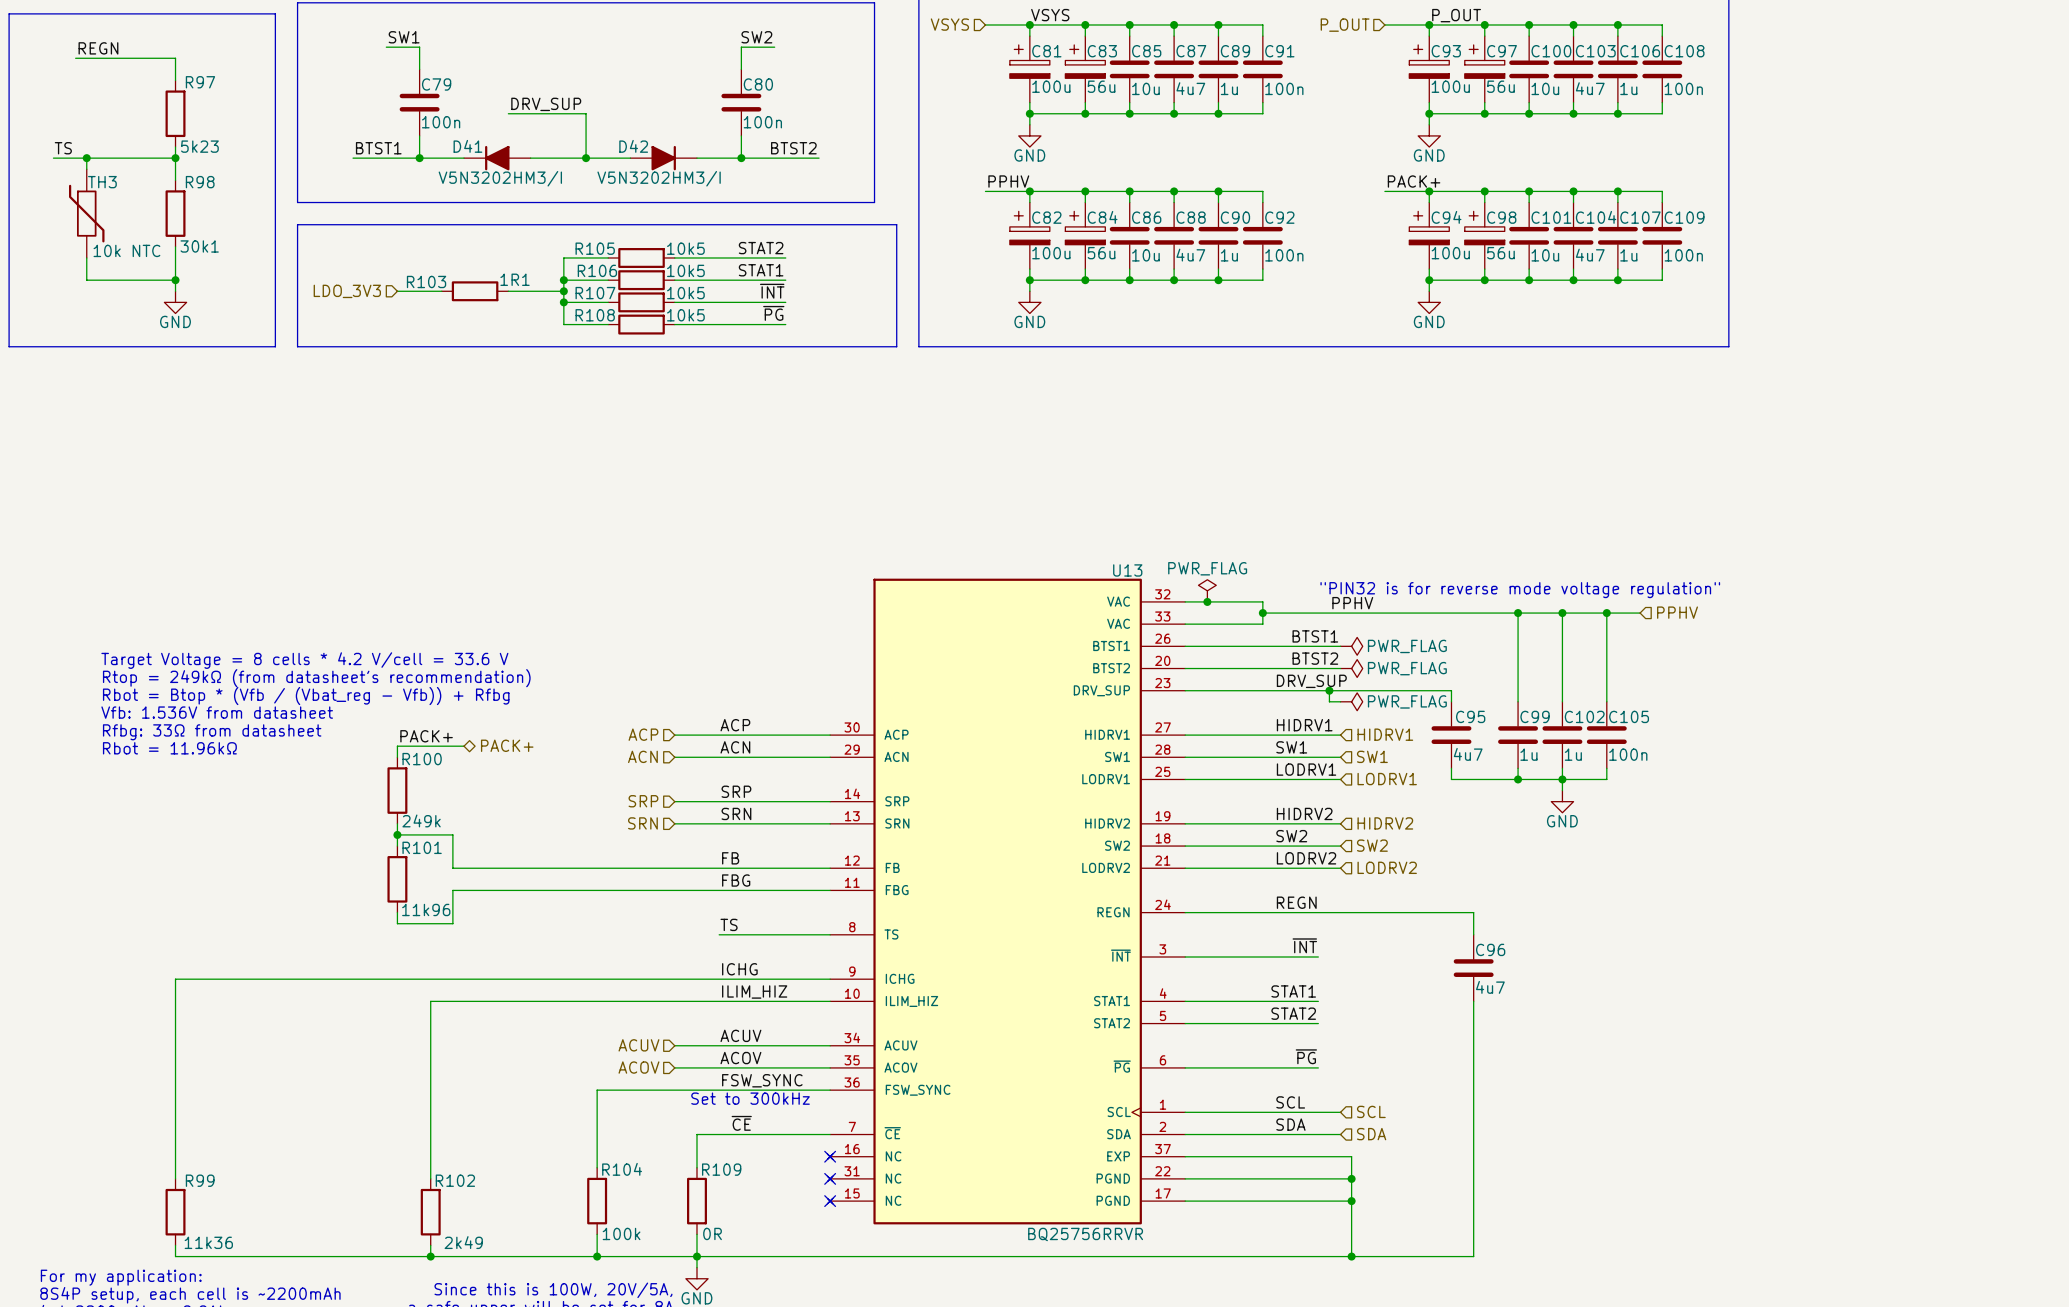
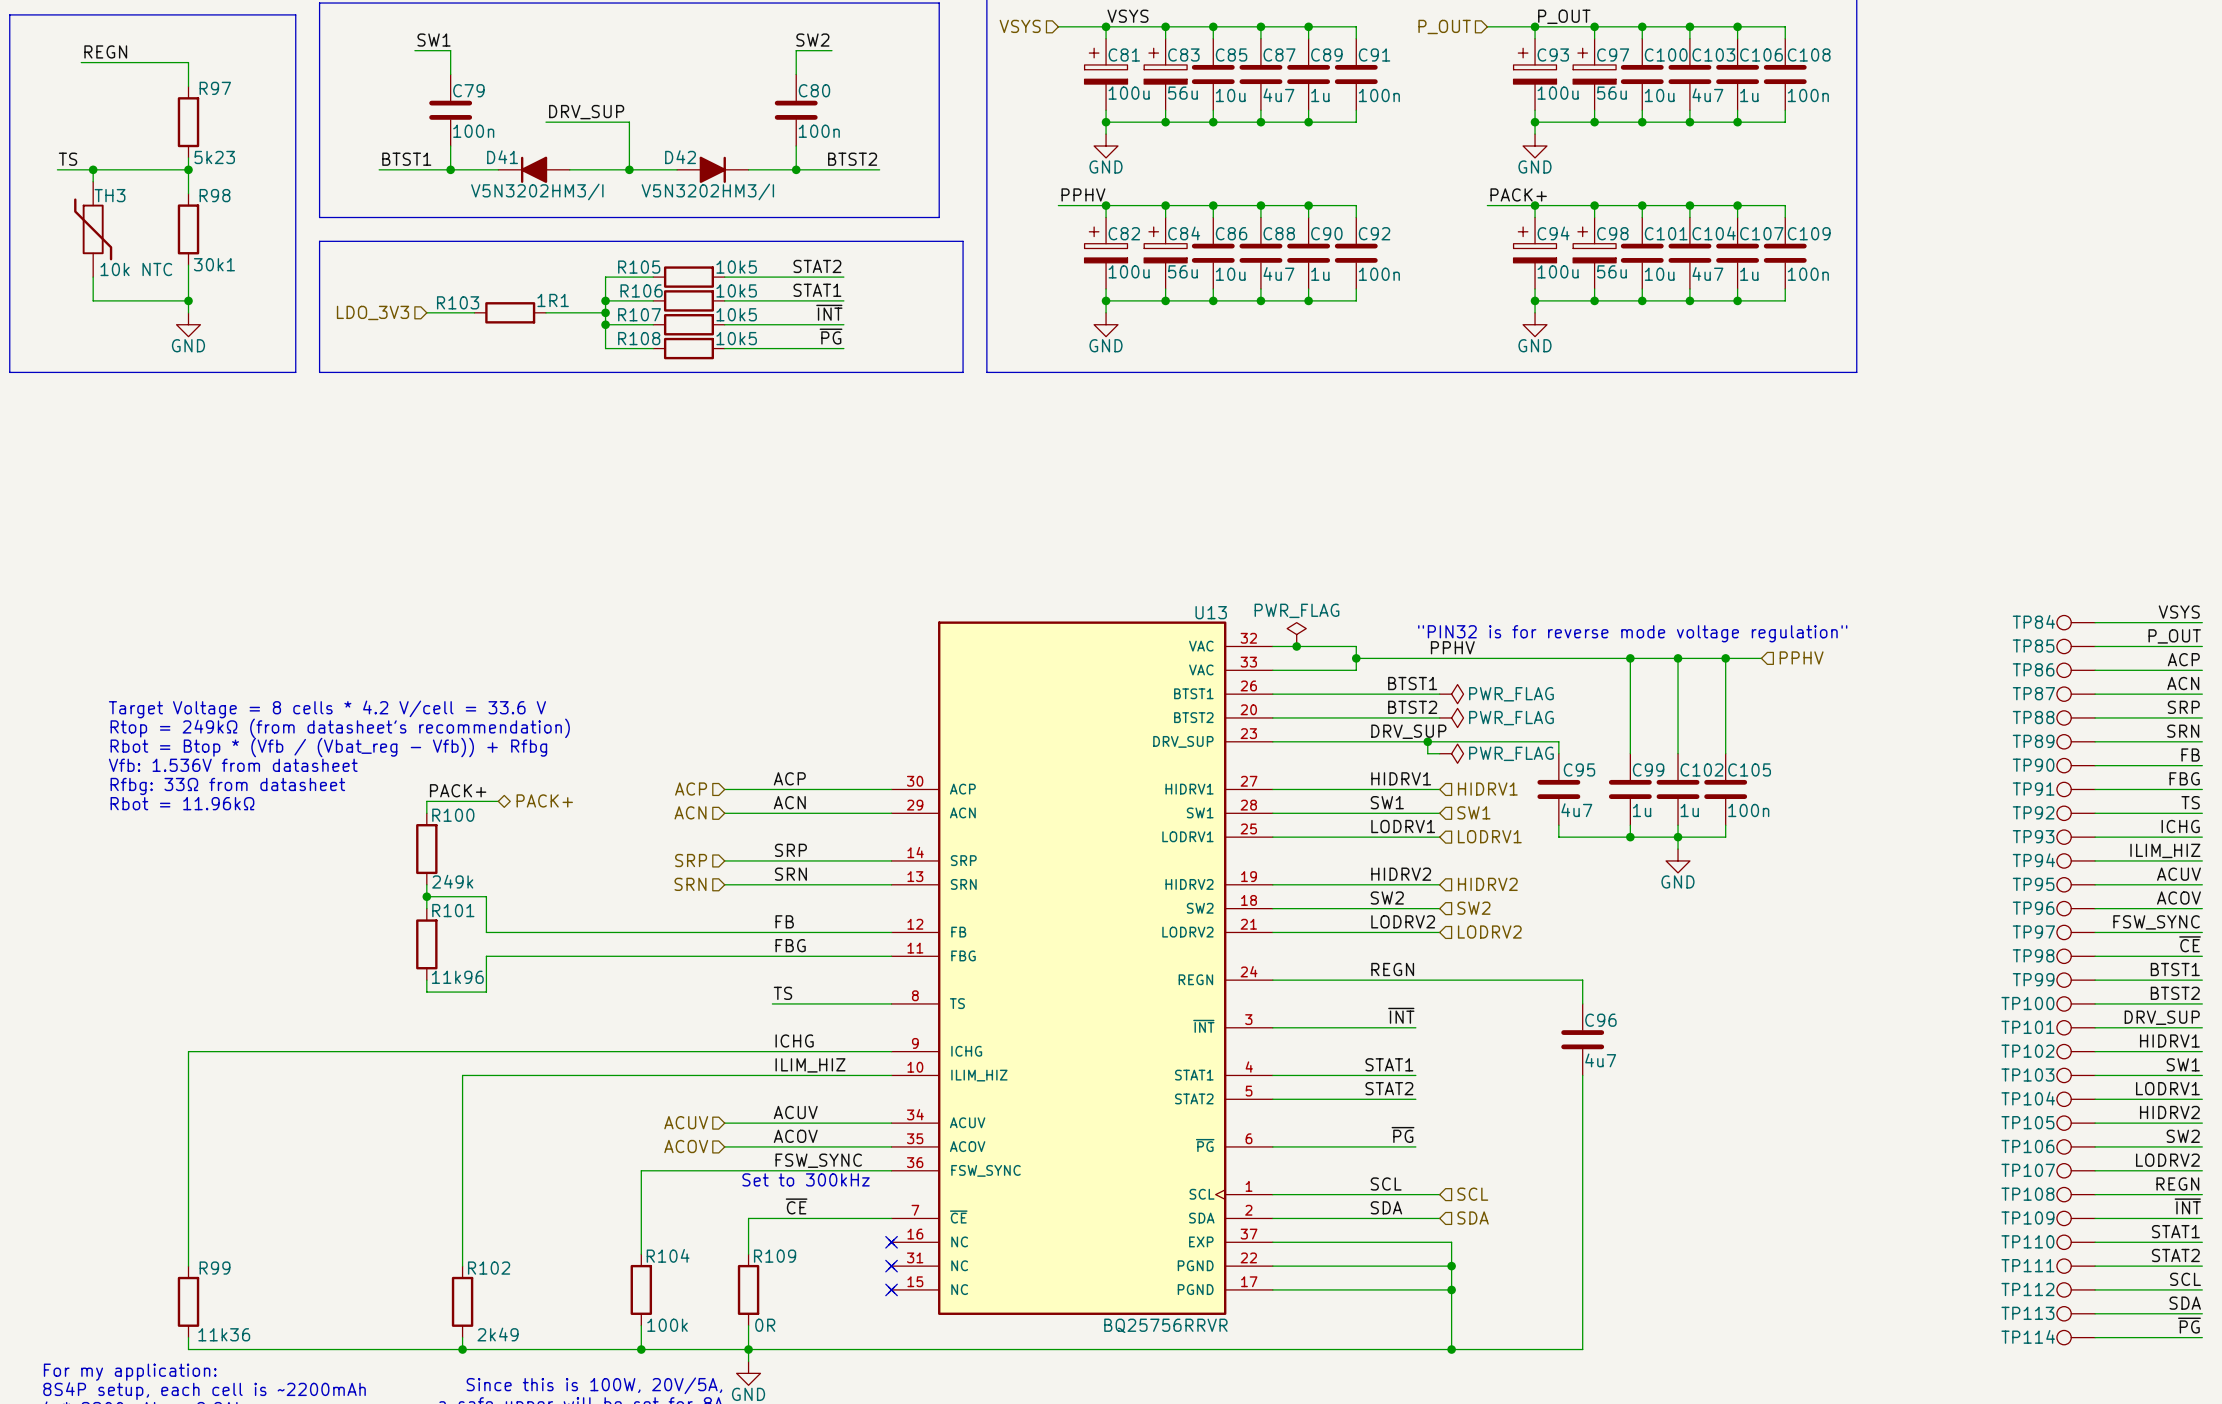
label: none -> VSYS (2179, 612)
TP84: none -> (2076, 622)
wire: none -> (2095, 622) (2202, 622)
label: none -> P_OUT (2174, 636)
TP85: none -> (2076, 646)
wire: none -> (2095, 646) (2202, 646)
label: none -> ACP (2183, 659)
TP86: none -> (2076, 670)
wire: none -> (2095, 670) (2202, 670)
label: none -> ACN (2183, 683)
TP87: none -> (2076, 694)
wire: none -> (2095, 694) (2202, 694)
label: none -> SRP (2183, 707)
TP88: none -> (2076, 717)
wire: none -> (2095, 717) (2202, 717)
label: none -> SRN (2183, 731)
TP89: none -> (2076, 741)
wire: none -> (2095, 741) (2202, 741)
label: none -> FB (2190, 755)
TP90: none -> (2076, 765)
wire: none -> (2095, 765) (2202, 765)
label: none -> FBG (2184, 778)
TP91: none -> (2076, 789)
wire: none -> (2095, 789) (2202, 789)
label: none -> TS (2190, 802)
TP92: none -> (2076, 813)
wire: none -> (2095, 813) (2202, 813)
label: none -> ICHG (2180, 826)
TP93: none -> (2076, 837)
wire: none -> (2095, 837) (2202, 837)
label: none -> ILIM_HIZ (2165, 850)
TP94: none -> (2076, 860)
wire: none -> (2095, 860) (2202, 860)
label: none -> ACUV (2178, 874)
TP95: none -> (2076, 884)
wire: none -> (2095, 884) (2202, 884)
label: none -> ACOV (2178, 898)
TP96: none -> (2076, 908)
wire: none -> (2095, 908) (2202, 908)
label: none -> FSW_SYNC (2156, 922)
TP97: none -> (2076, 932)
wire: none -> (2095, 932) (2202, 932)
label: none -> ~{CE} (2190, 944)
TP98: none -> (2076, 956)
wire: none -> (2095, 956) (2202, 956)
label: none -> BTST1 (2175, 969)
TP99: none -> (2076, 980)
wire: none -> (2095, 980) (2202, 980)
label: none -> BTST2 (2175, 993)
TP100: none -> (2076, 1003)
wire: none -> (2095, 1003) (2202, 1003)
label: none -> DRV_SUP (2162, 1017)
TP101: none -> (2076, 1027)
wire: none -> (2095, 1027) (2202, 1027)
label: none -> HIDRV1 (2169, 1040)
TP102: none -> (2076, 1051)
wire: none -> (2095, 1051) (2202, 1051)
label: none -> SW1 (2183, 1064)
TP103: none -> (2076, 1075)
wire: none -> (2095, 1075) (2202, 1075)
label: none -> LODRV1 (2167, 1088)
TP104: none -> (2076, 1099)
wire: none -> (2095, 1099) (2202, 1099)
label: none -> HIDRV2 (2169, 1112)
TP105: none -> (2076, 1123)
wire: none -> (2095, 1123) (2202, 1123)
label: none -> SW2 (2183, 1136)
TP106: none -> (2076, 1146)
wire: none -> (2095, 1146) (2202, 1146)
label: none -> LODRV2 (2167, 1160)
TP107: none -> (2076, 1170)
wire: none -> (2095, 1170) (2202, 1170)
label: none -> REGN (2177, 1183)
TP108: none -> (2076, 1194)
wire: none -> (2095, 1194) (2202, 1194)
label: none -> ~{INT} (2187, 1206)
TP109: none -> (2076, 1218)
wire: none -> (2095, 1218) (2202, 1218)
label: none -> STAT1 (2175, 1231)
TP110: none -> (2076, 1242)
wire: none -> (2095, 1242) (2202, 1242)
label: none -> STAT2 (2175, 1255)
TP111: none -> (2076, 1266)
wire: none -> (2095, 1266) (2202, 1266)
label: none -> SCL (2185, 1279)
TP112: none -> (2076, 1289)
wire: none -> (2095, 1289) (2202, 1289)
label: none -> SDA (2185, 1303)
TP113: none -> (2076, 1313)
wire: none -> (2095, 1313) (2202, 1313)
label: none -> ~{PG} (2189, 1325)
TP114: none -> (2076, 1337)
wire: none -> (2095, 1337) (2202, 1337)

